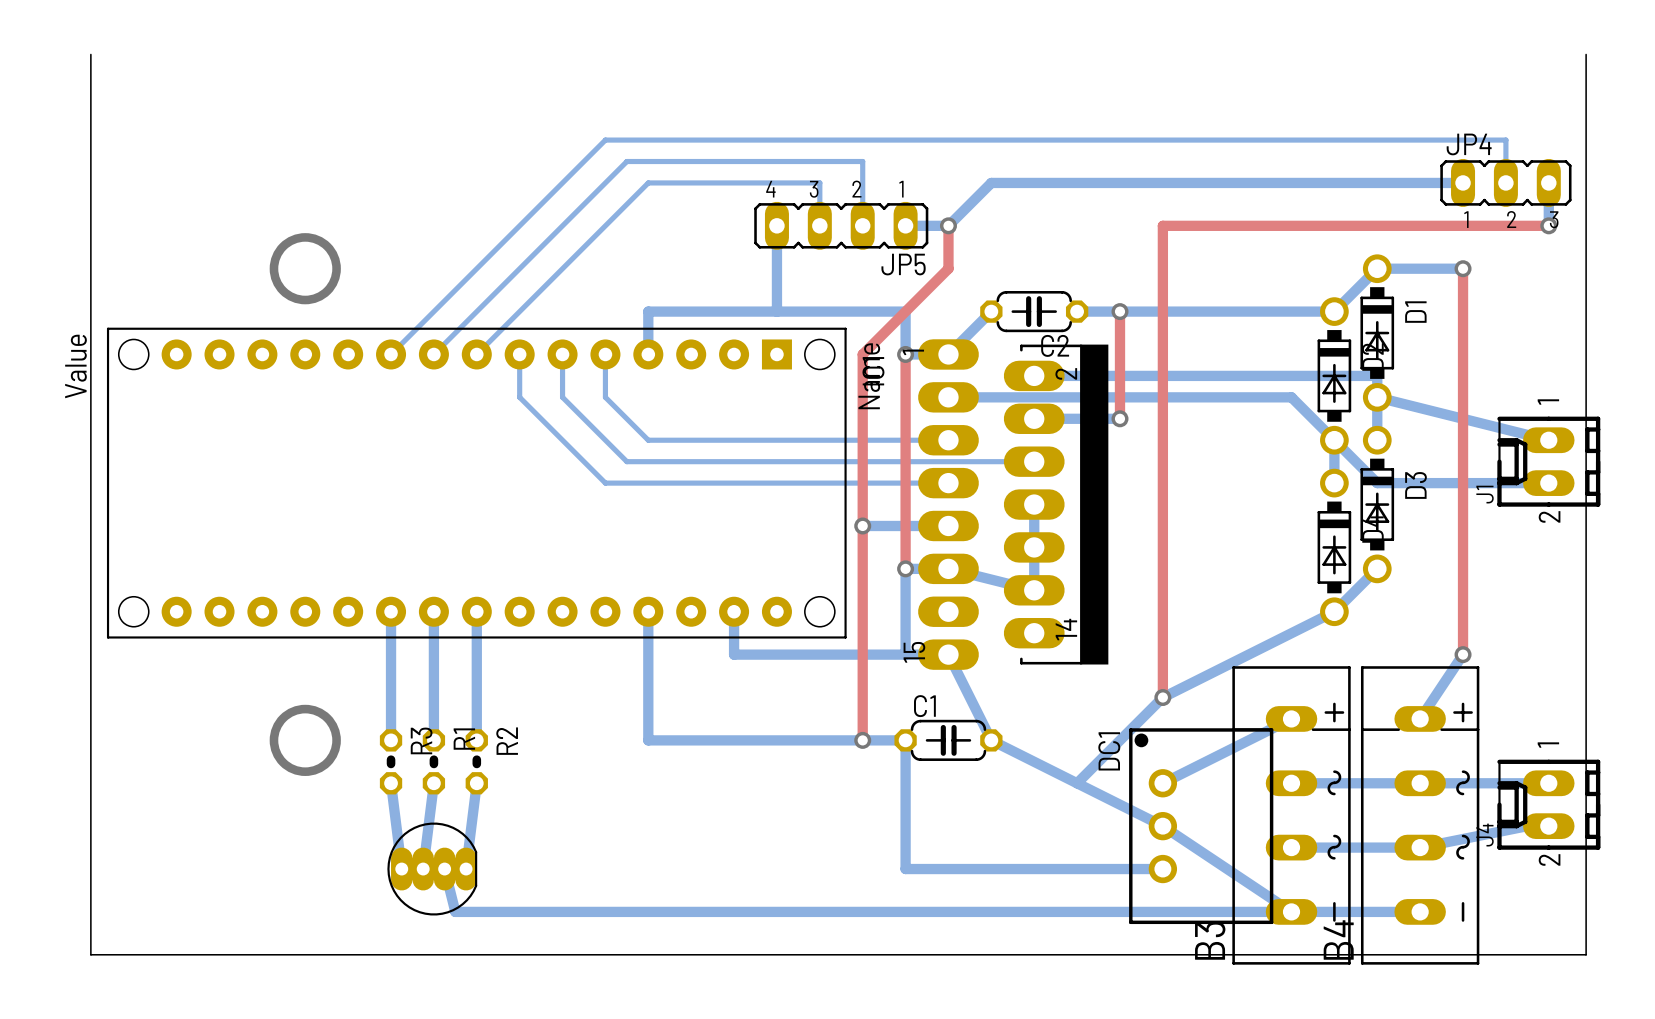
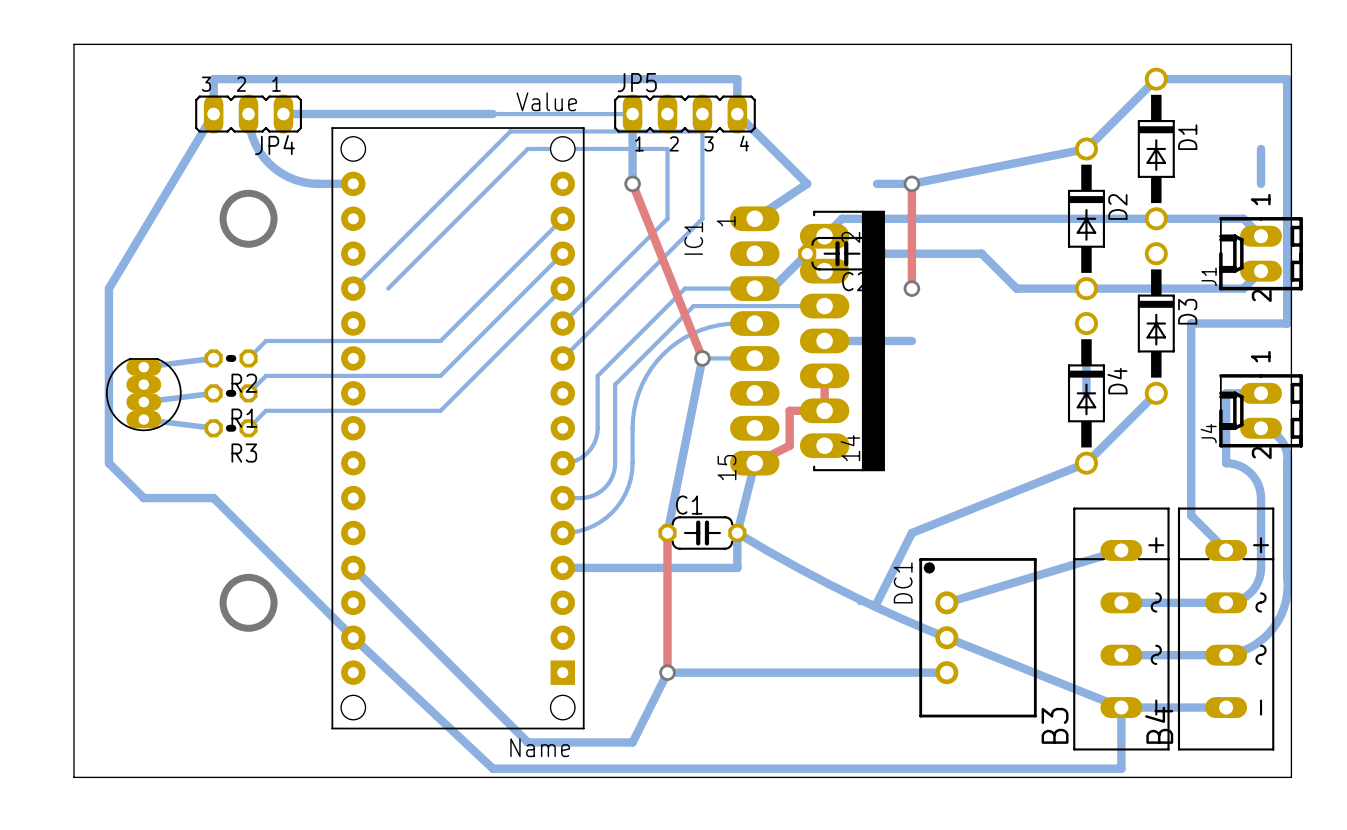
board edge: none -> (73, 44) (1291, 44)
bottom track: none -> (248, 114) (250, 129) (255, 144) (263, 157) (281, 173) (295, 179) (310, 183) (353, 183)
bottom track: (605, 140) (391, 354) -> (492, 114) (283, 114)
bottom track: (776, 140) (1505, 140) (1505, 182) -> none
JP4 name position: JP4 (1469, 144) -> JP4 (274, 145)
bottom track: (1463, 182) (991, 182) (948, 225) (905, 225) -> none
JP4 position: (1505, 182) -> (248, 114)
JP5 text position: 4 (770, 189) -> 4 (744, 143)
JP5 text position: 3 (814, 189) -> 3 (709, 143)
JP5 text position: 2 (856, 189) -> 2 (674, 143)
JP5 text position: 1 (901, 189) -> 1 (639, 143)
JP4 text position: 1 (1466, 219) -> 1 (276, 84)
JP4 text position: 2 (1511, 219) -> 2 (241, 84)
JP4 text position: 3 (1554, 219) -> 3 (206, 84)
bottom track: (776, 225) (776, 311) -> (632, 183) (632, 114)
top track: none -> (632, 183) (702, 358)
via: none -> (632, 183)
bottom track: none -> (667, 183) (667, 218) (562, 323)
JP5 position: (841, 225) -> (684, 114)
bottom track: none -> (702, 183) (702, 218) (562, 358)
top track: (948, 225) (948, 268) (862, 354) (862, 740) -> none
via: (948, 225) -> none
bottom track: none -> (876, 183) (911, 183) (1086, 148) (1156, 79) (1287, 79) (1287, 323) (1191, 323) (1191, 515) (1226, 550)
top track: none -> (911, 183) (911, 253)
via: none -> (911, 183)
top track: (1548, 225) (1162, 225) (1162, 697) -> none
via: (1548, 225) -> none
D1 footprint: [1360, 254, 1395, 412] -> [1137, 67, 1175, 231]
JP5 name position: JP5 (903, 264) -> JP5 (637, 82)
bottom track: none -> (562, 218) (440, 340) (266, 340) (248, 358)
bottom track: none -> (754, 218) (807, 183) (737, 114) (737, 79) (213, 79) (213, 114) (108, 288) (108, 463) (143, 498) (213, 498) (353, 637) (492, 768) (1121, 768) (1121, 707)
bottom track: (1377, 268) (1334, 311) (1205, 311) -> (1261, 271) (1243, 288) (1016, 288) (981, 253)
bottom track: none -> (1121, 218) (842, 218) (824, 236)
bottom track: none -> (1191, 218) (1243, 218) (1261, 236)
top track: (1463, 268) (1463, 654) -> none
via: (1463, 268) -> none
D2 footprint: [1317, 297, 1352, 455] -> [1067, 137, 1105, 301]
bottom track: none -> (562, 253) (440, 375) (266, 375) (248, 393)
via: (1119, 311) -> none
bottom track: (519, 354) (519, 397) (605, 483) (948, 483) -> none
bottom track: (562, 354) (562, 397) (626, 461) (1034, 461) -> none
bottom track: (605, 354) (605, 397) (648, 440) (862, 440) -> (667, 533) (702, 358)
bottom track: (648, 354) (648, 311) (905, 311) (905, 354) -> (562, 463) (576, 460) (584, 455) (595, 441) (597, 428) (597, 375) (684, 288) (737, 288)
bottom track: none -> (562, 288) (440, 410) (266, 410) (248, 428)
top track: (905, 354) (905, 568) -> none
via: (905, 354) -> none
top track: (1119, 354) (1119, 418) -> none
via: none -> (911, 288)
bottom track: none -> (824, 306) (693, 306) (615, 384) (614, 467) (607, 484) (601, 490) (589, 496) (562, 498)
bottom track: (1034, 375) (1377, 375) (1377, 440) -> none
bottom track: none -> (754, 323) (728, 323) (701, 329) (684, 337) (663, 354) (646, 375) (636, 401) (632, 419) (632, 470) (628, 486) (621, 500) (612, 512) (599, 522) (578, 531) (562, 533)
bottom track: (948, 397) (1291, 397) (1377, 483) (1505, 483) -> (1121, 602) (1230, 602) (1243, 598) (1256, 585) (1261, 567) (1260, 493) (1256, 480) (1250, 473) (1239, 465) (1226, 463) (1226, 393)
bottom track: (1377, 397) (1548, 440) -> none
via: (1119, 418) -> none
D3 footprint: [1360, 425, 1395, 584] -> [1137, 242, 1175, 405]
bottom track: none -> (213, 358) (143, 367)
via: none -> (702, 358)
top track: none -> (824, 375) (824, 410) (789, 410) (789, 445) (754, 463)
J1 position: (1548, 461) -> (1261, 253)
D4 footprint: [1317, 468, 1352, 627] -> [1067, 312, 1105, 475]
bottom track: none -> (213, 393) (143, 402)
part rotation: 0° (476, 483) -> 90° clockwise (458, 428)
bottom track: none -> (1156, 393) (1086, 463) (911, 533) (876, 602) (859, 602) (860, 600)
part: none -> (143, 394)
IC1 position: (1013, 504) -> (807, 340)
bottom track: (1034, 504) (1034, 590) (948, 568) (905, 568) (905, 654) -> (754, 463) (737, 533)
bottom track: none -> (143, 419) (213, 428)
bottom track: (862, 525) (948, 525) -> none
via: (862, 525) -> none
bottom track: none -> (1261, 428) (1268, 430) (1278, 437) (1285, 447) (1287, 455) (1287, 592) (1284, 607) (1277, 622) (1261, 639) (1248, 648) (1233, 653) (1121, 655)
via: (905, 568) -> none
bottom track: (1377, 568) (1334, 611) (1162, 697) (1077, 783) -> none
bottom track: (391, 611) (391, 740) -> none
bottom track: (433, 611) (433, 740) -> none
bottom track: (476, 611) (476, 740) -> none
bottom track: (648, 611) (648, 740) (905, 740) (905, 869) (1162, 869) -> none
bottom track: (734, 611) (734, 654) (948, 654) (991, 740) (1162, 826) (1291, 911) -> none
top track: none -> (667, 533) (667, 672)
bottom track: none -> (737, 533) (737, 567) (562, 567)
bottom track: none -> (737, 533) (798, 568) (860, 600)
bottom track: (1463, 654) (1420, 718) -> none
via: (1463, 654) -> none
bottom track: none -> (1121, 550) (946, 602)
via: (1162, 697) -> none
bottom track: (1291, 718) (1162, 783) -> none
bottom track: none -> (860, 600) (925, 628) (1121, 707)
via: (862, 740) -> none
C1 position: (948, 740) -> (702, 533)
R3 rotation: 0° (391, 761) -> 90° clockwise (231, 428)
R3 position: (391, 761) -> (231, 428)
R1 rotation: 0° (433, 761) -> 90° clockwise (231, 393)
R1 position: (433, 761) -> (231, 393)
R2 rotation: 0° (476, 761) -> 90° clockwise (231, 358)
R2 position: (476, 761) -> (231, 358)
bottom track: (391, 783) (401, 869) -> none
bottom track: (433, 783) (423, 869) -> none
bottom track: (476, 783) (466, 869) -> none
bottom track: (1291, 783) (1548, 783) -> none
J4 position: (1548, 804) -> (1261, 410)
B3 position: (1291, 815) -> (1121, 629)
B4 position: (1420, 815) -> (1226, 629)
via: none -> (667, 672)
DC1 position: (1201, 826) -> (978, 637)
bottom track: (1548, 826) (1527, 826) (1420, 847) (1291, 847) -> none
part: (432, 869) -> none
bottom track: (444, 869) (455, 911) (648, 911) -> (353, 567) (527, 742)
bottom track: none -> (1121, 707) (1226, 707)
bottom track: (776, 911) (1420, 911) -> (632, 742) (667, 672) (946, 672)

